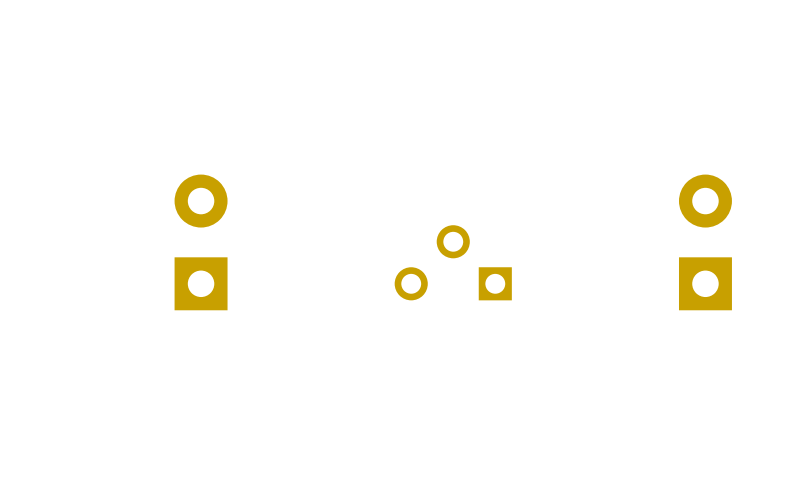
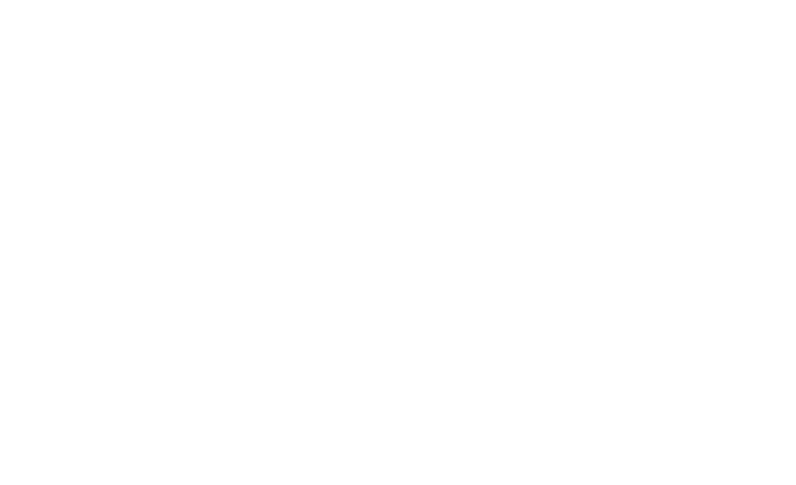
part: (201, 242) -> none
part: (705, 242) -> none
part: (453, 262) -> none

